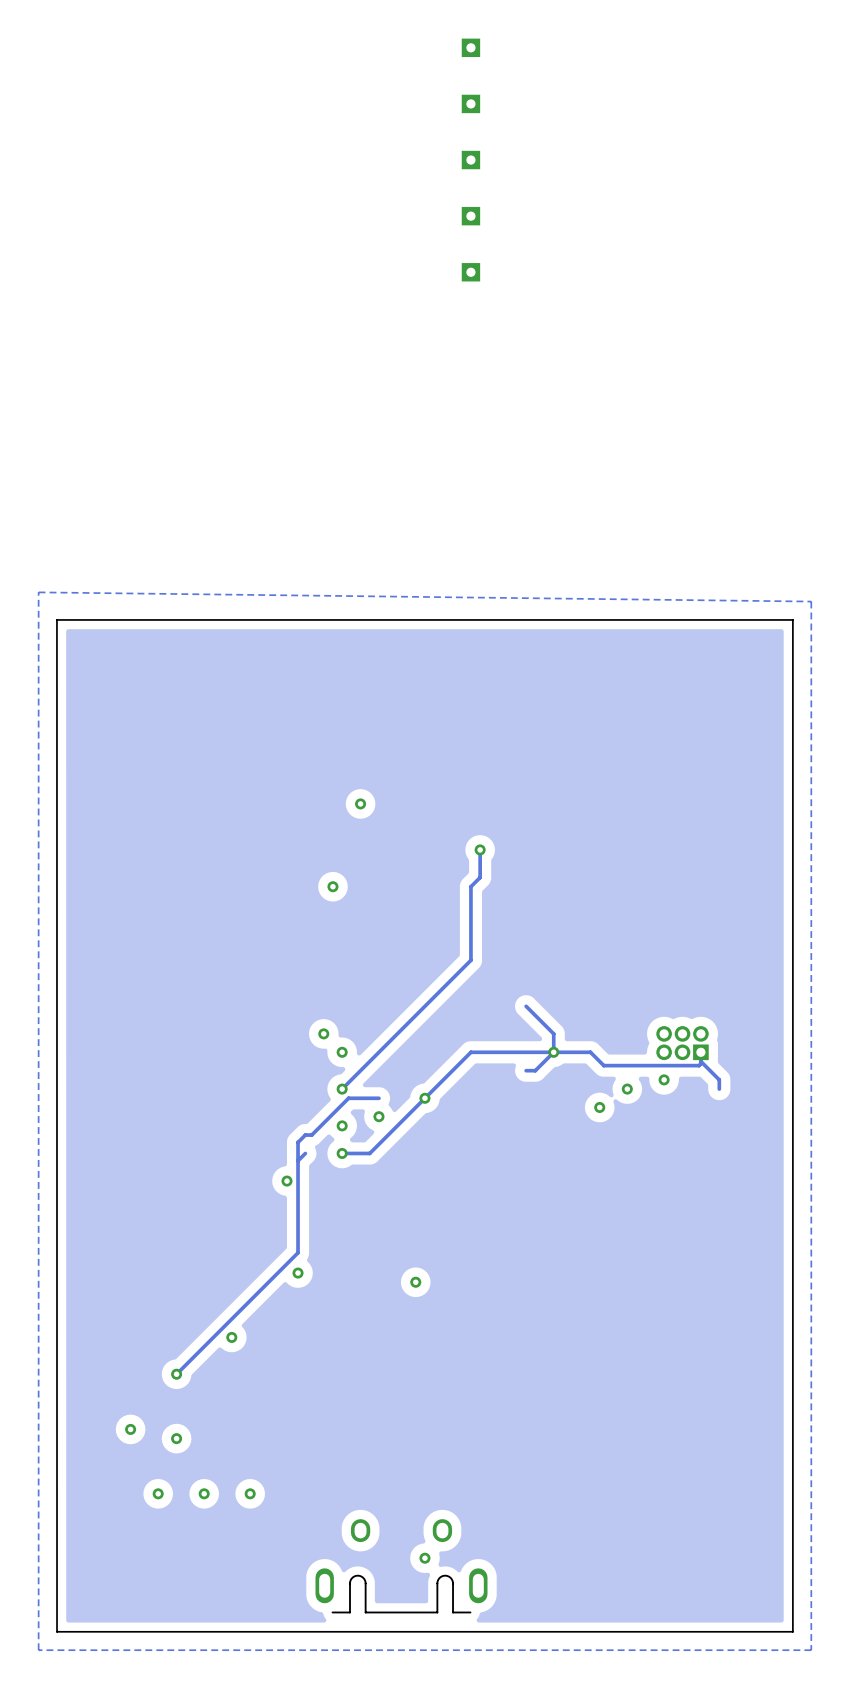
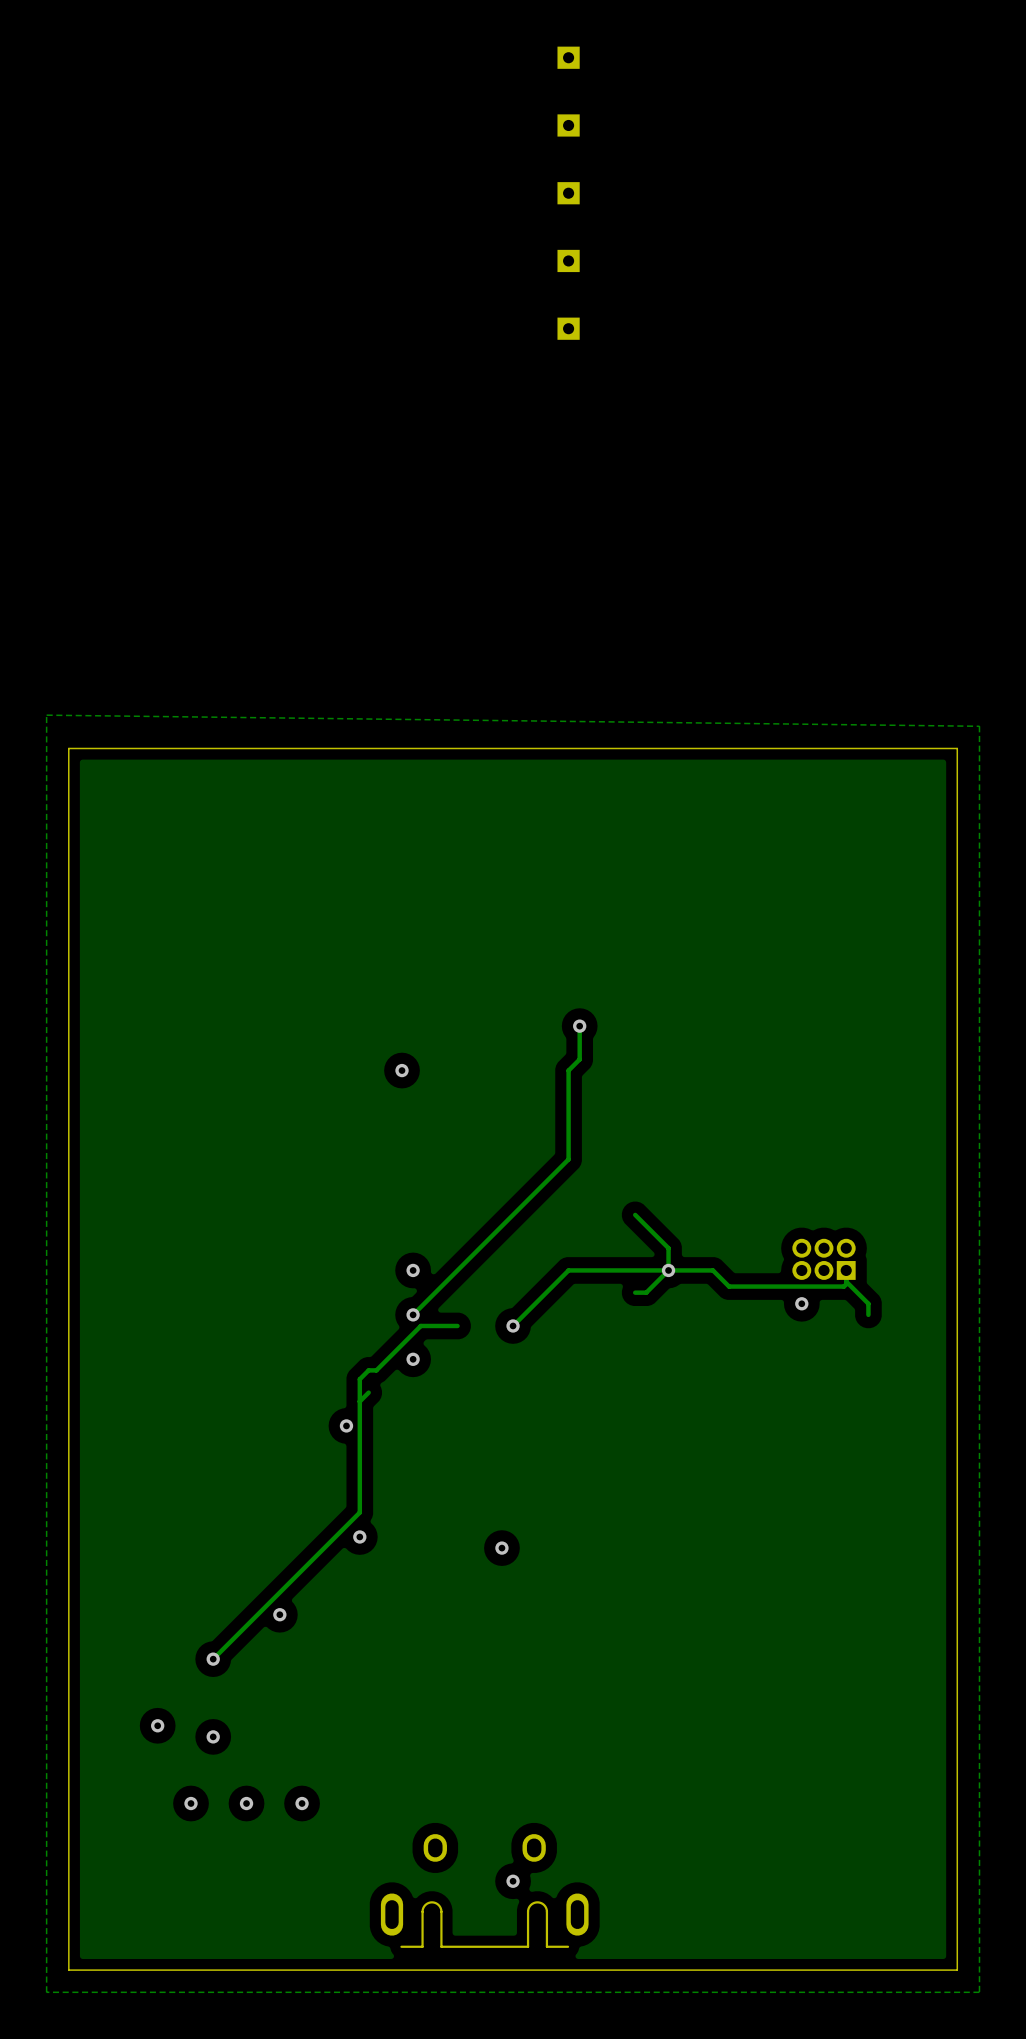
via: (360, 803) -> none
via: (323, 1033) -> none
via: (627, 1089) -> none
track: (424, 1098) (369, 1153) (342, 1153) -> none
via: (599, 1107) -> none
via: (378, 1116) -> none
via: (342, 1153) -> none

